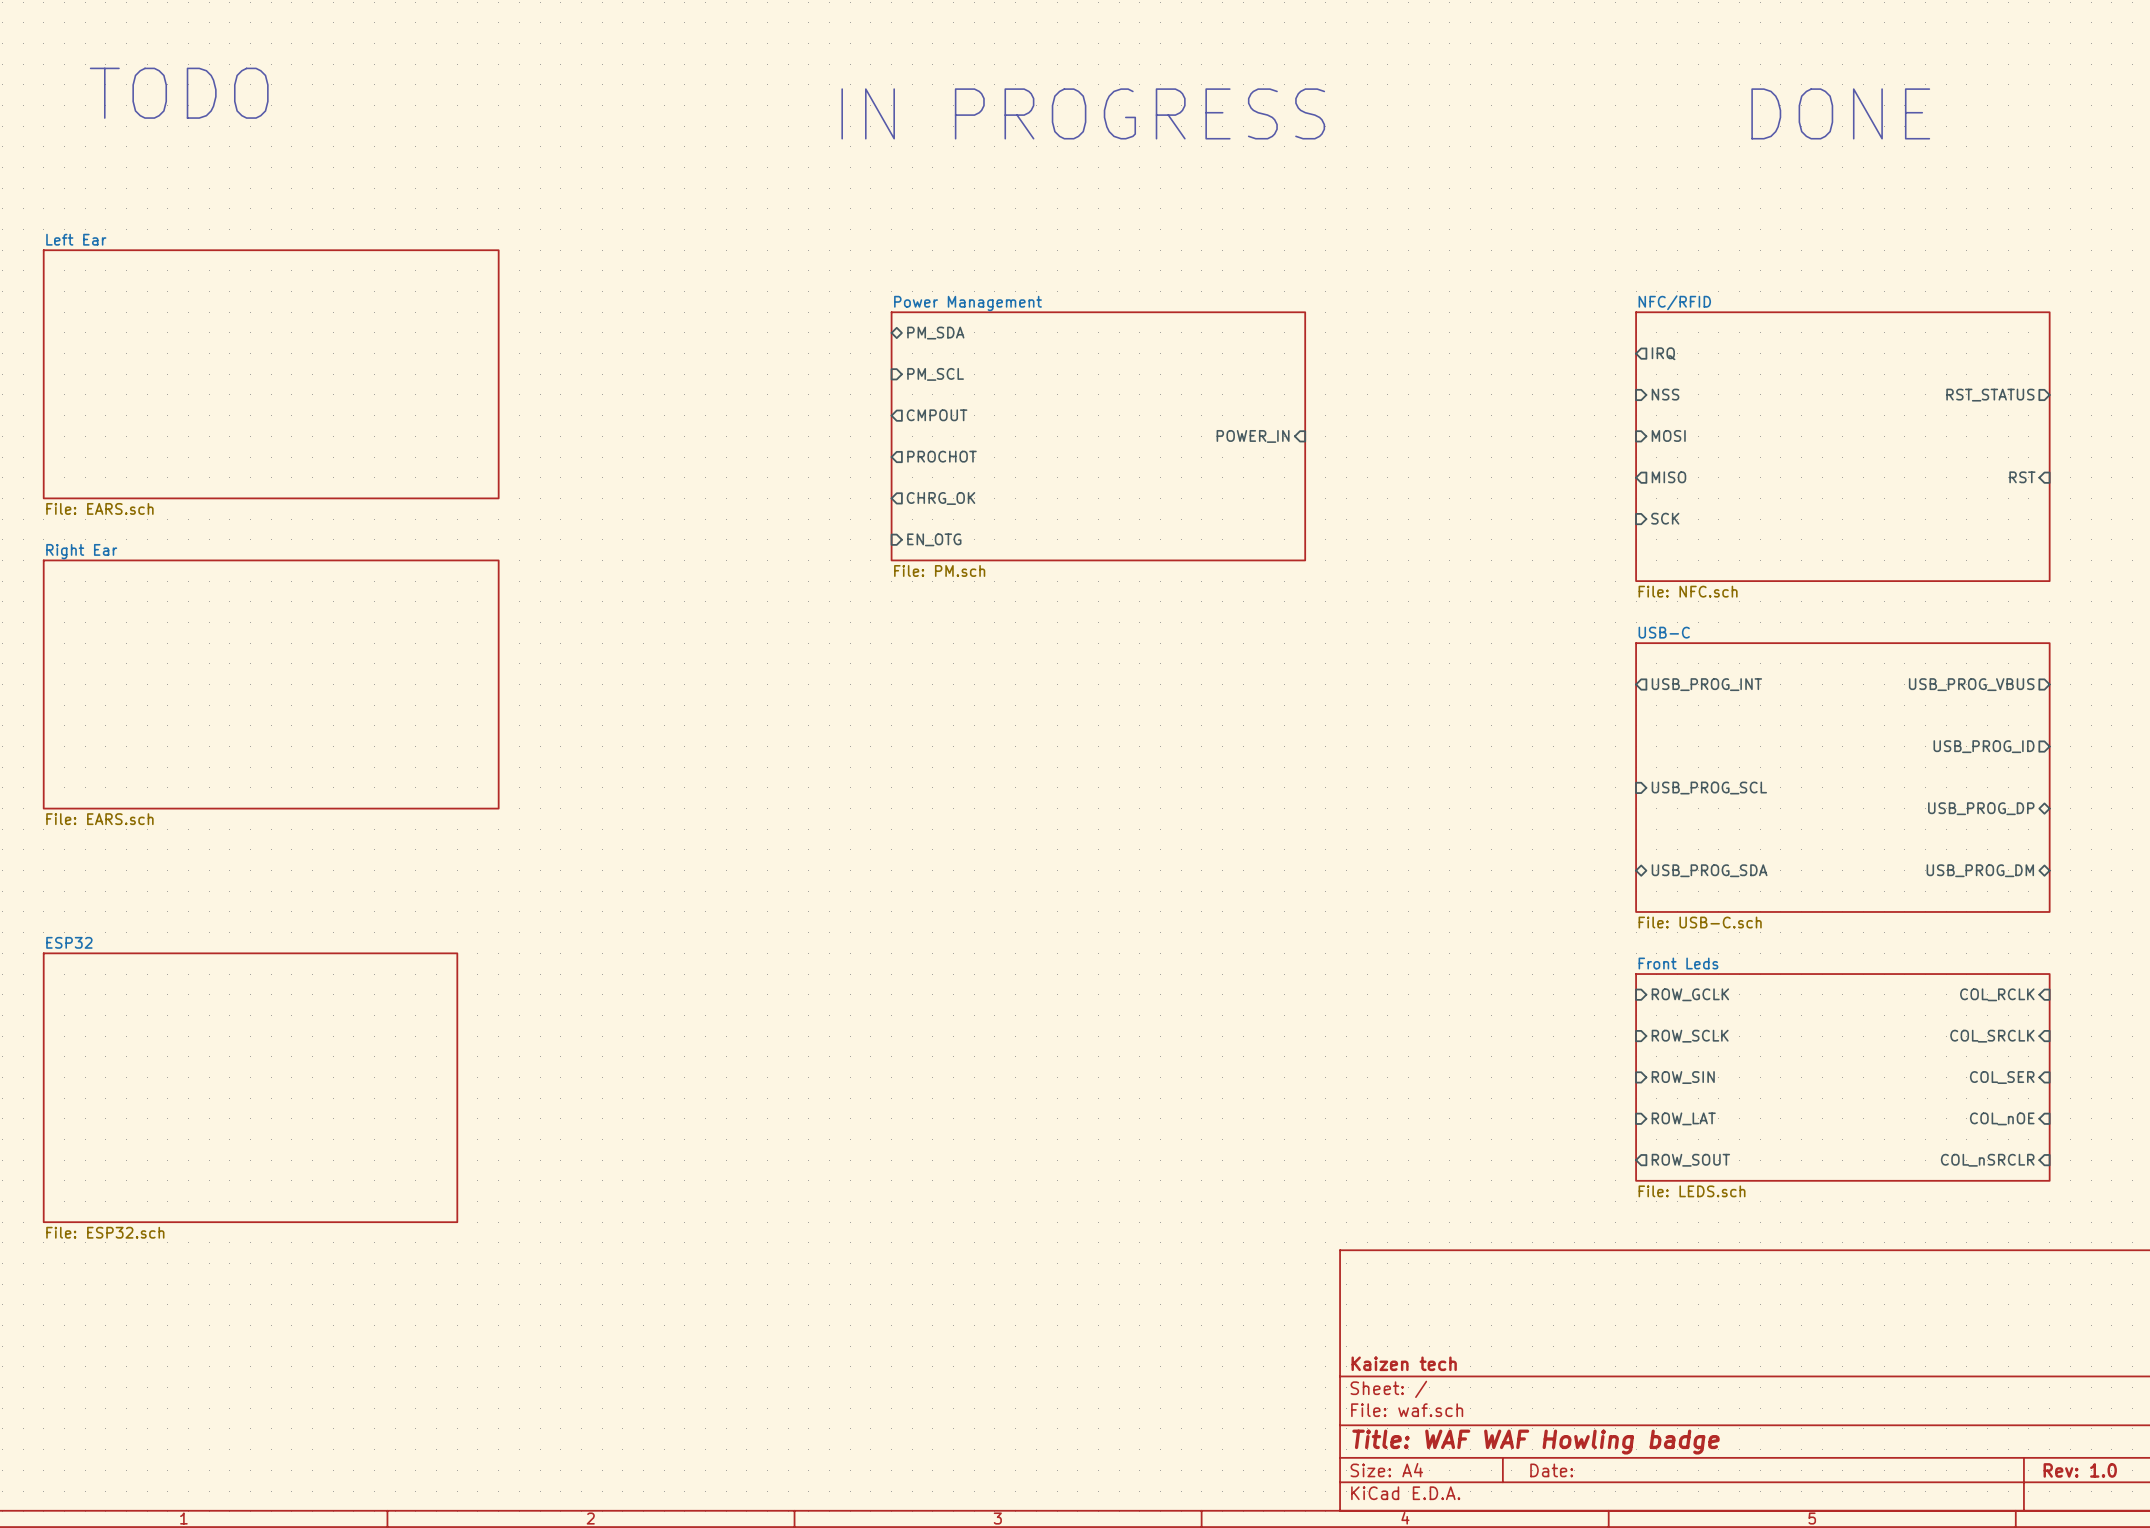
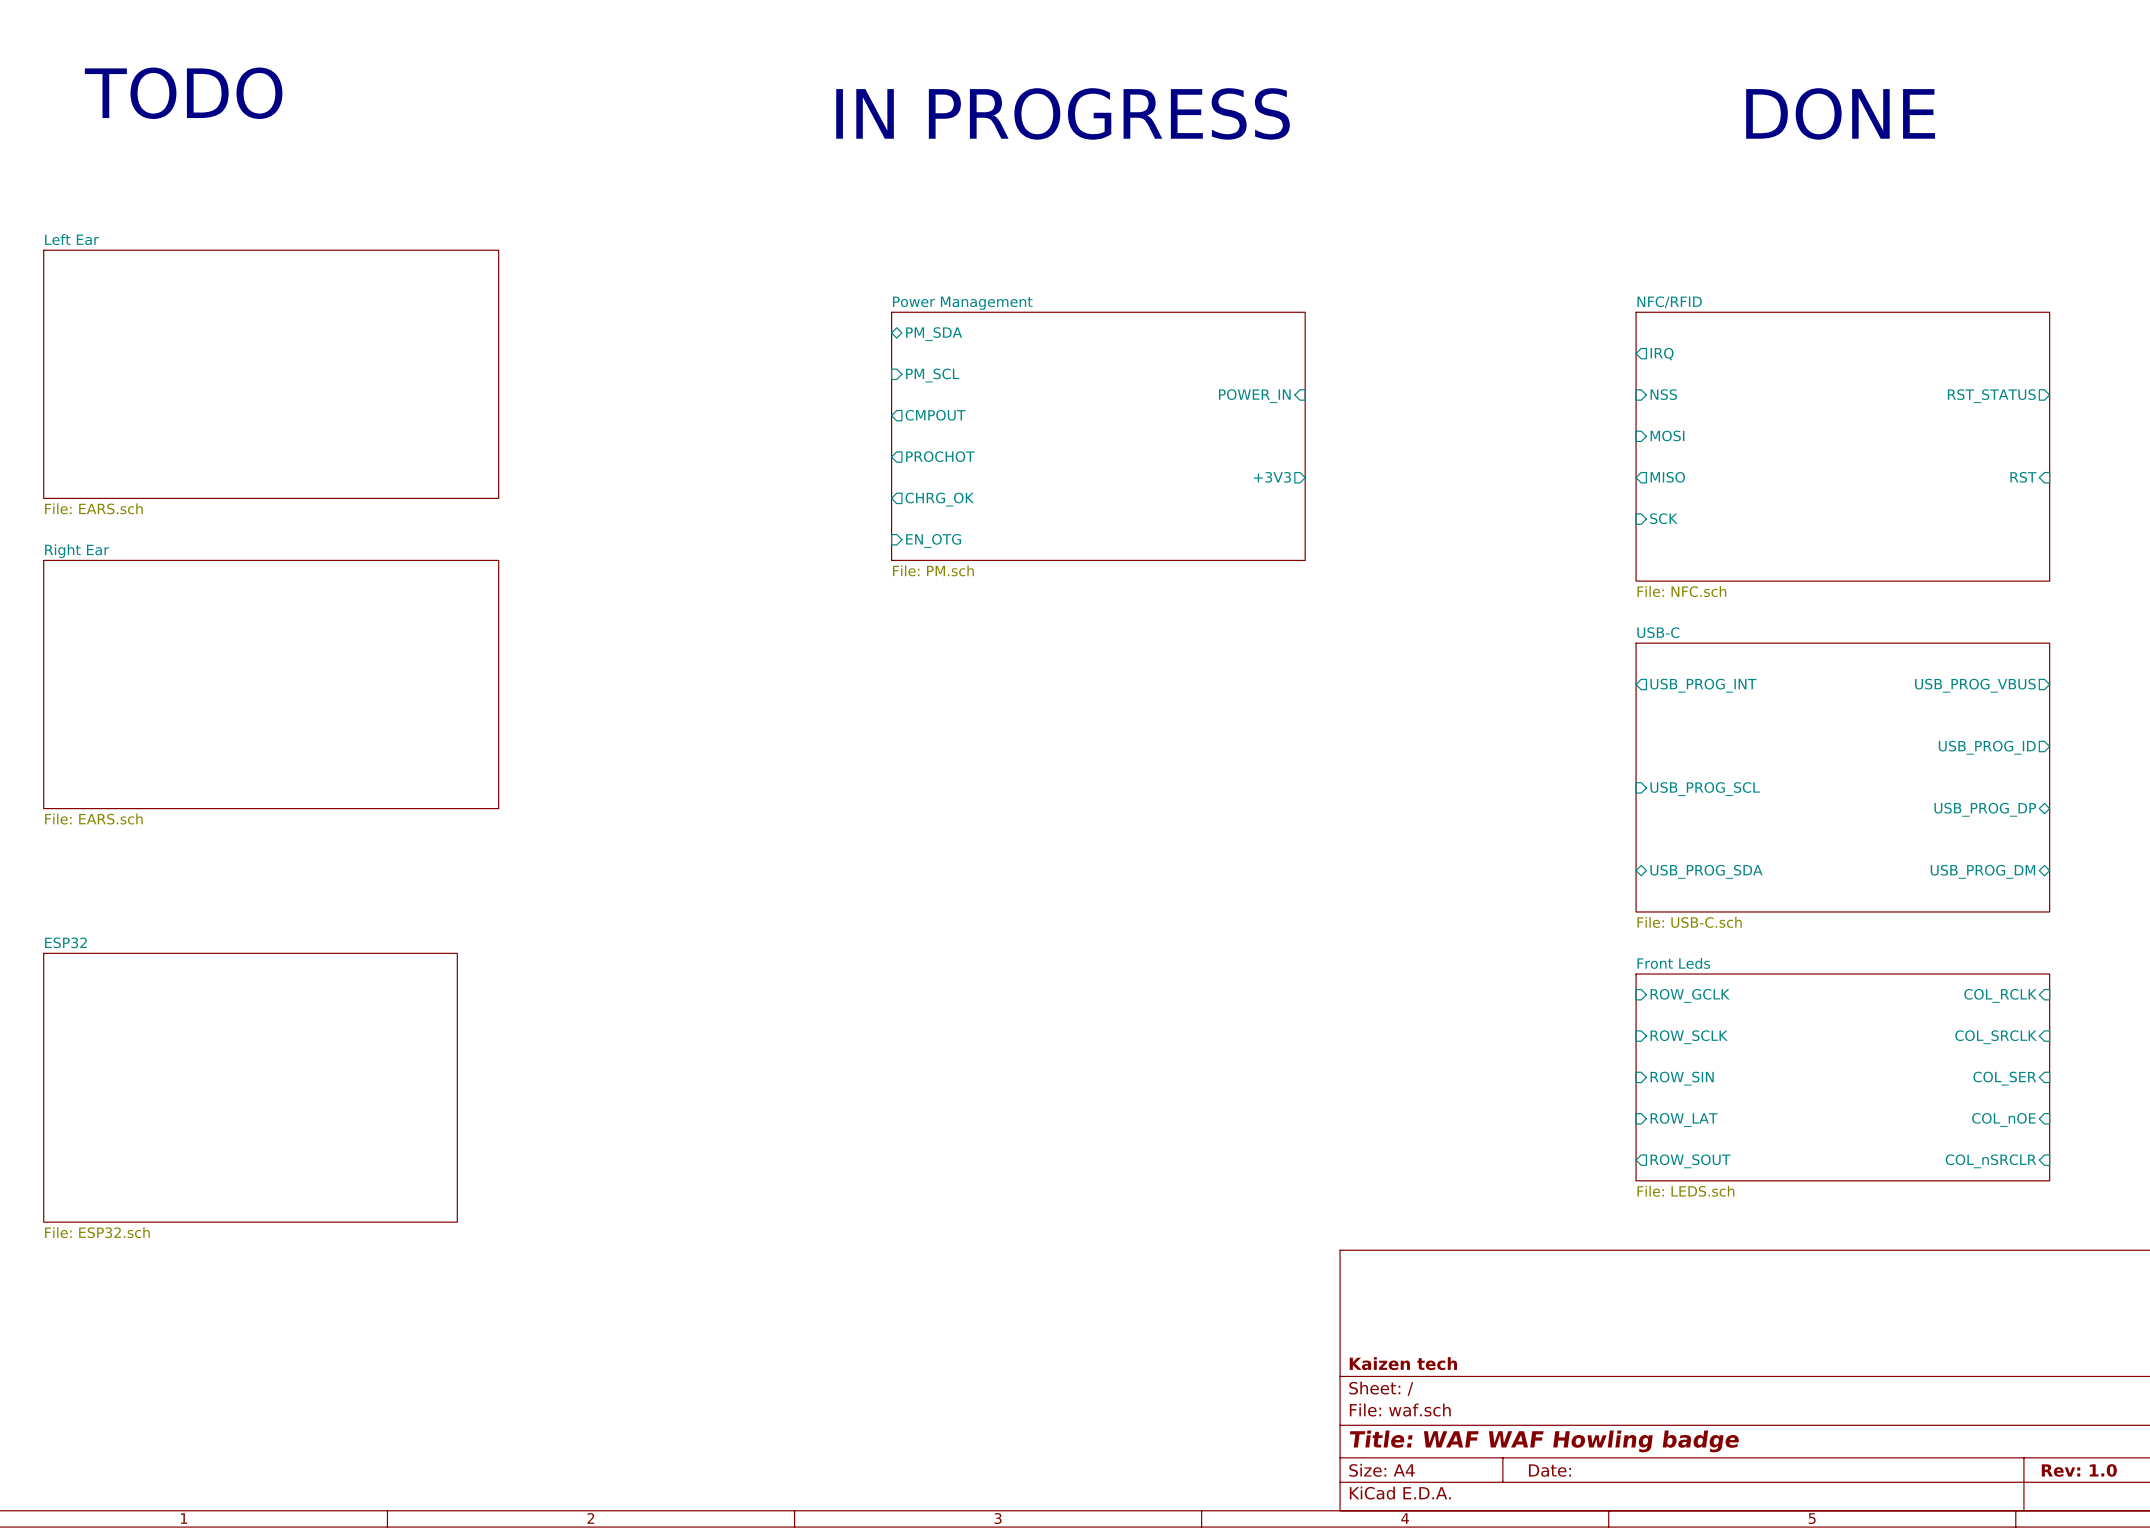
sheet pin position: POWER_IN (1253, 436) -> POWER_IN (1254, 396)
sheet pin: none -> +3V3 (1272, 477)

